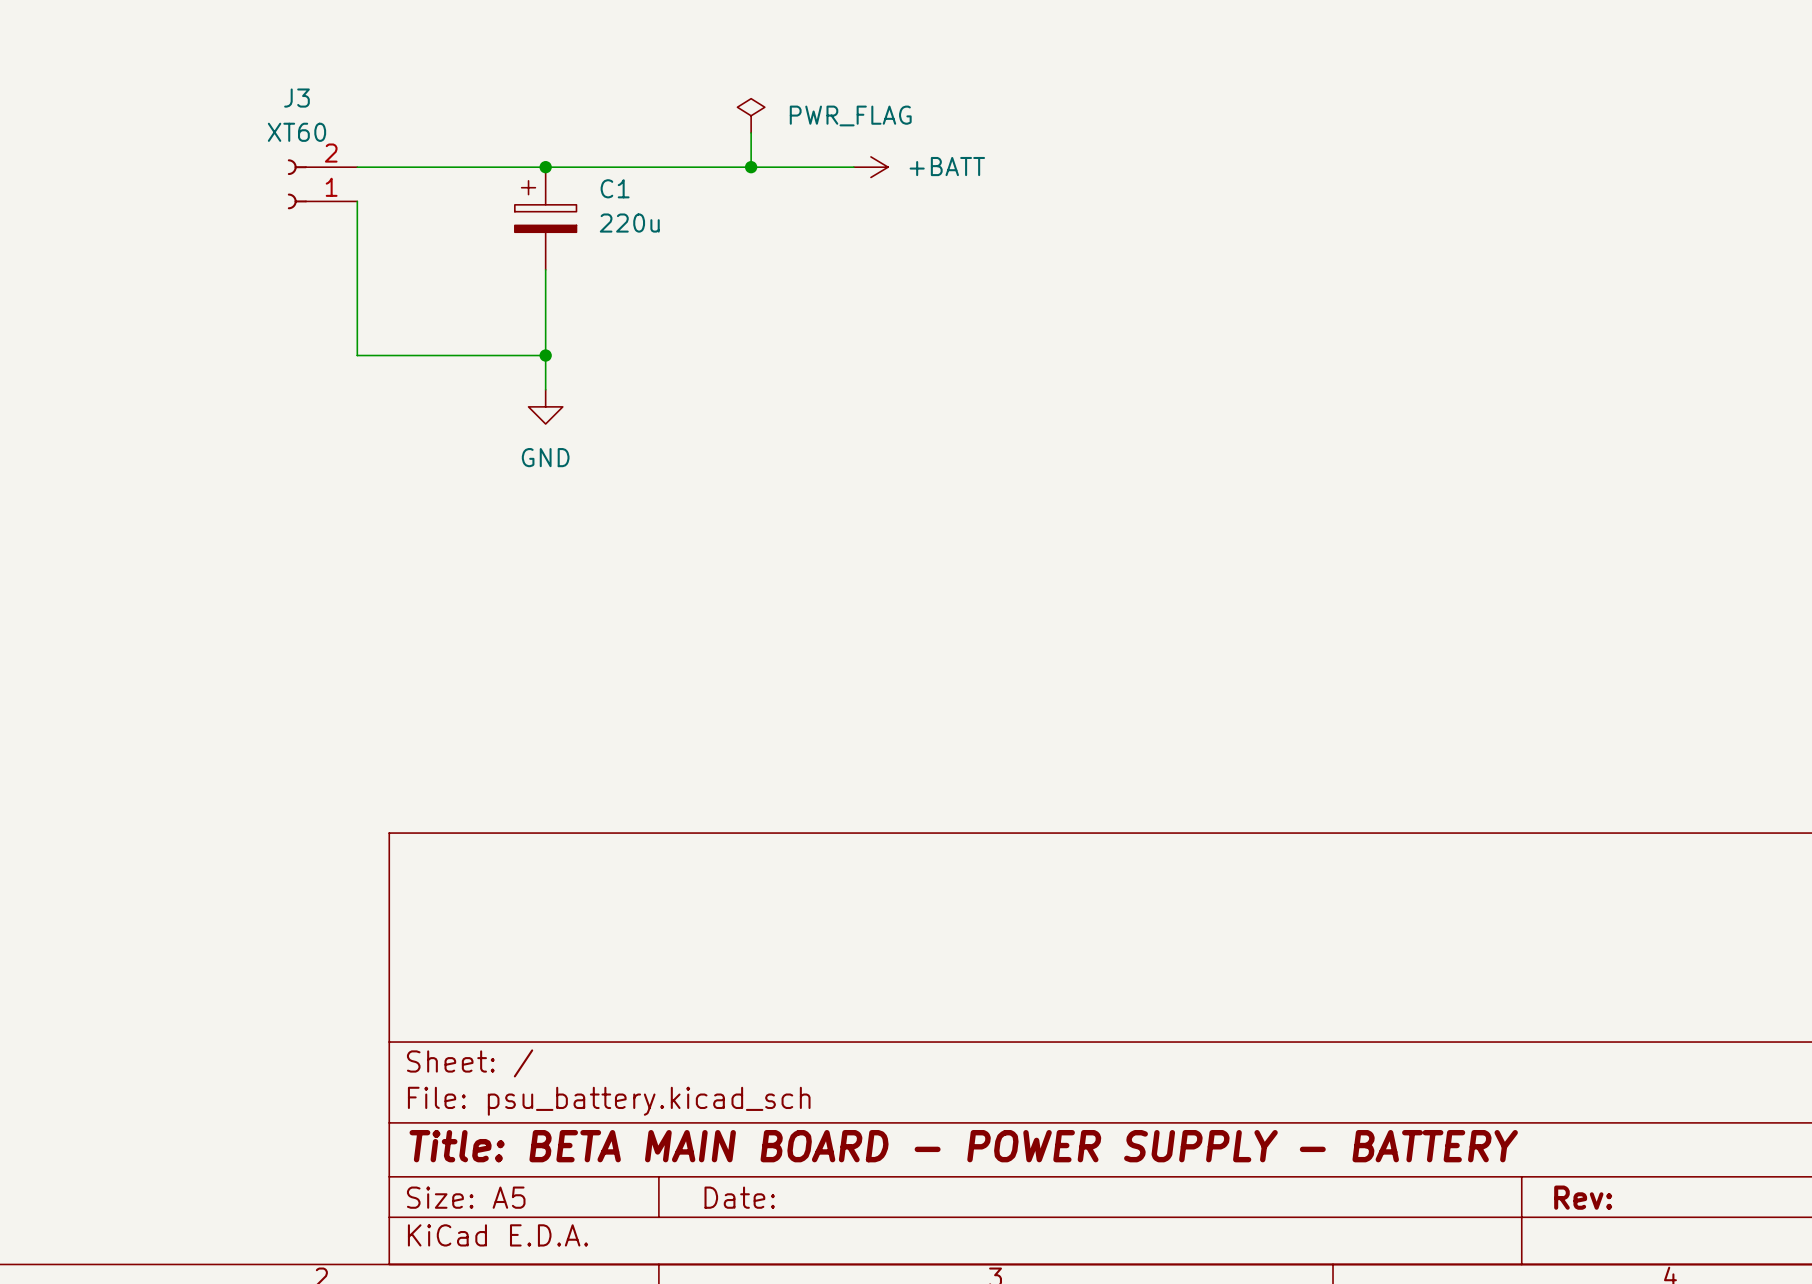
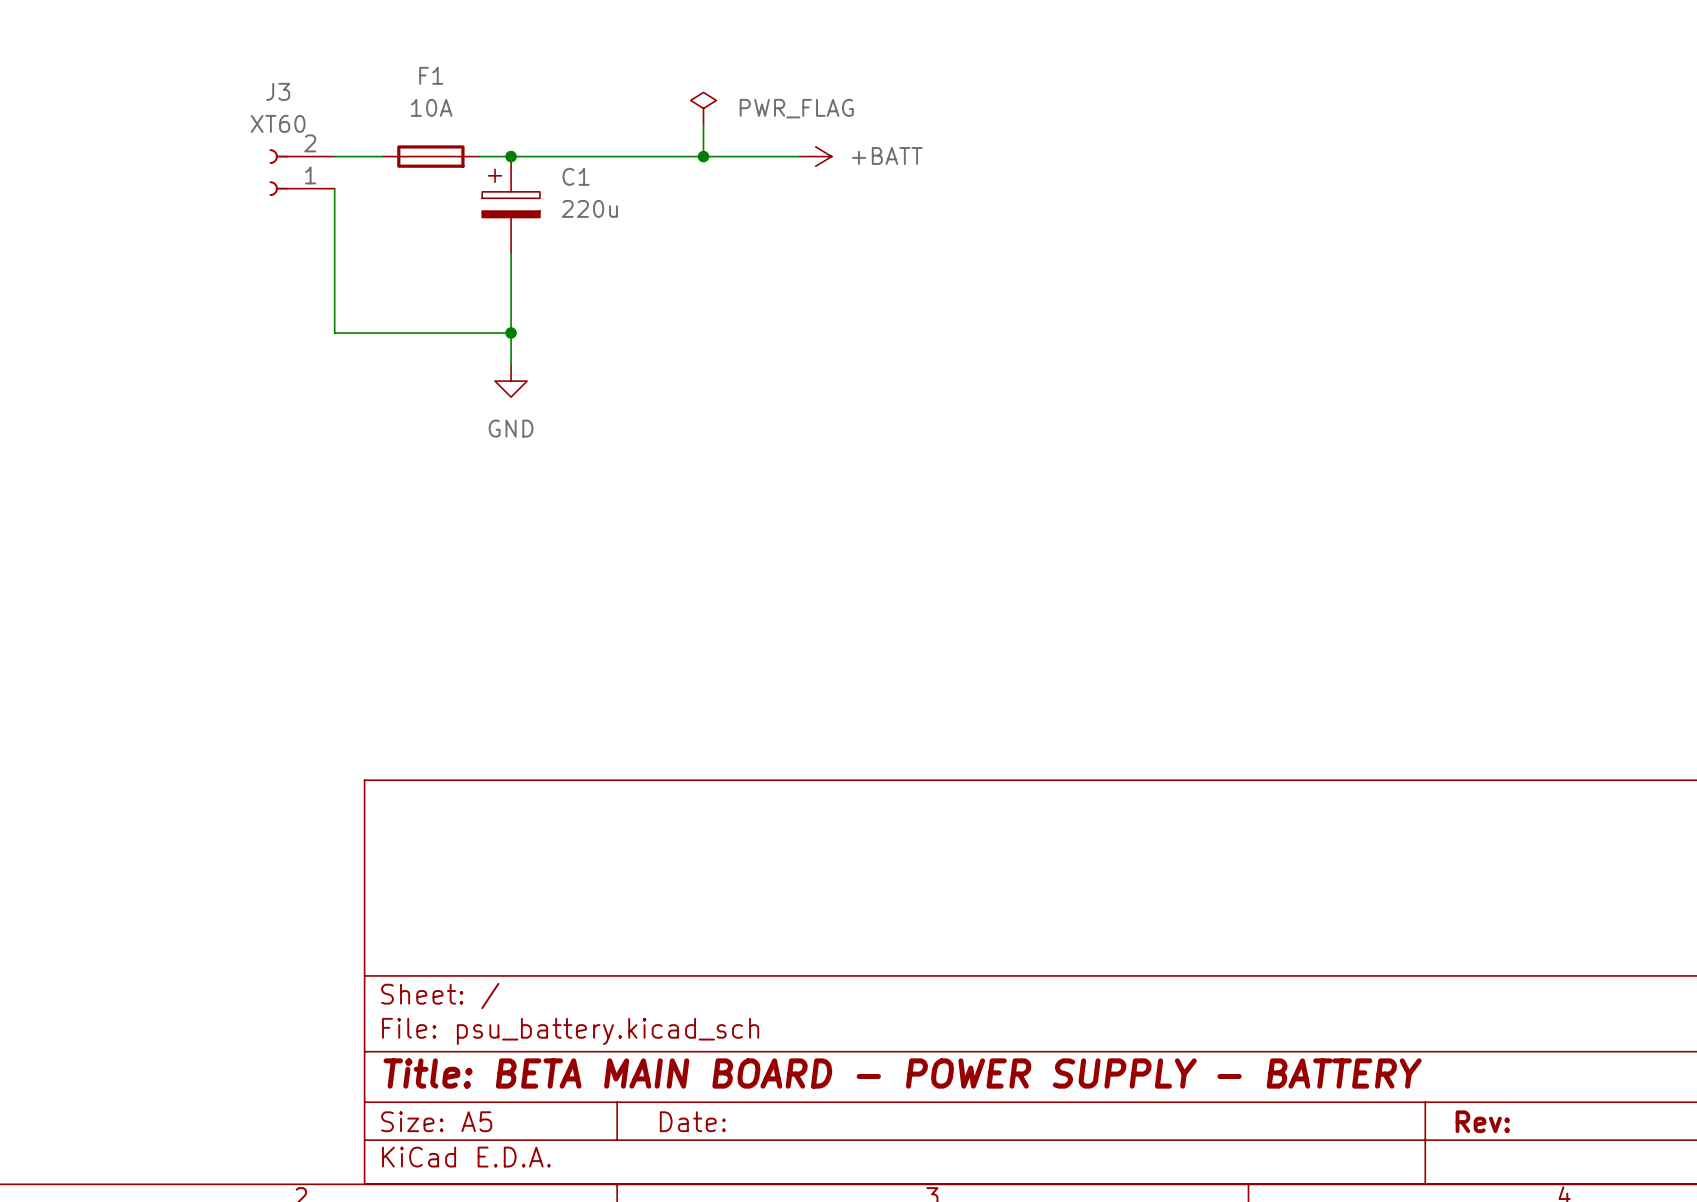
F1: none -> 10A (430, 156)

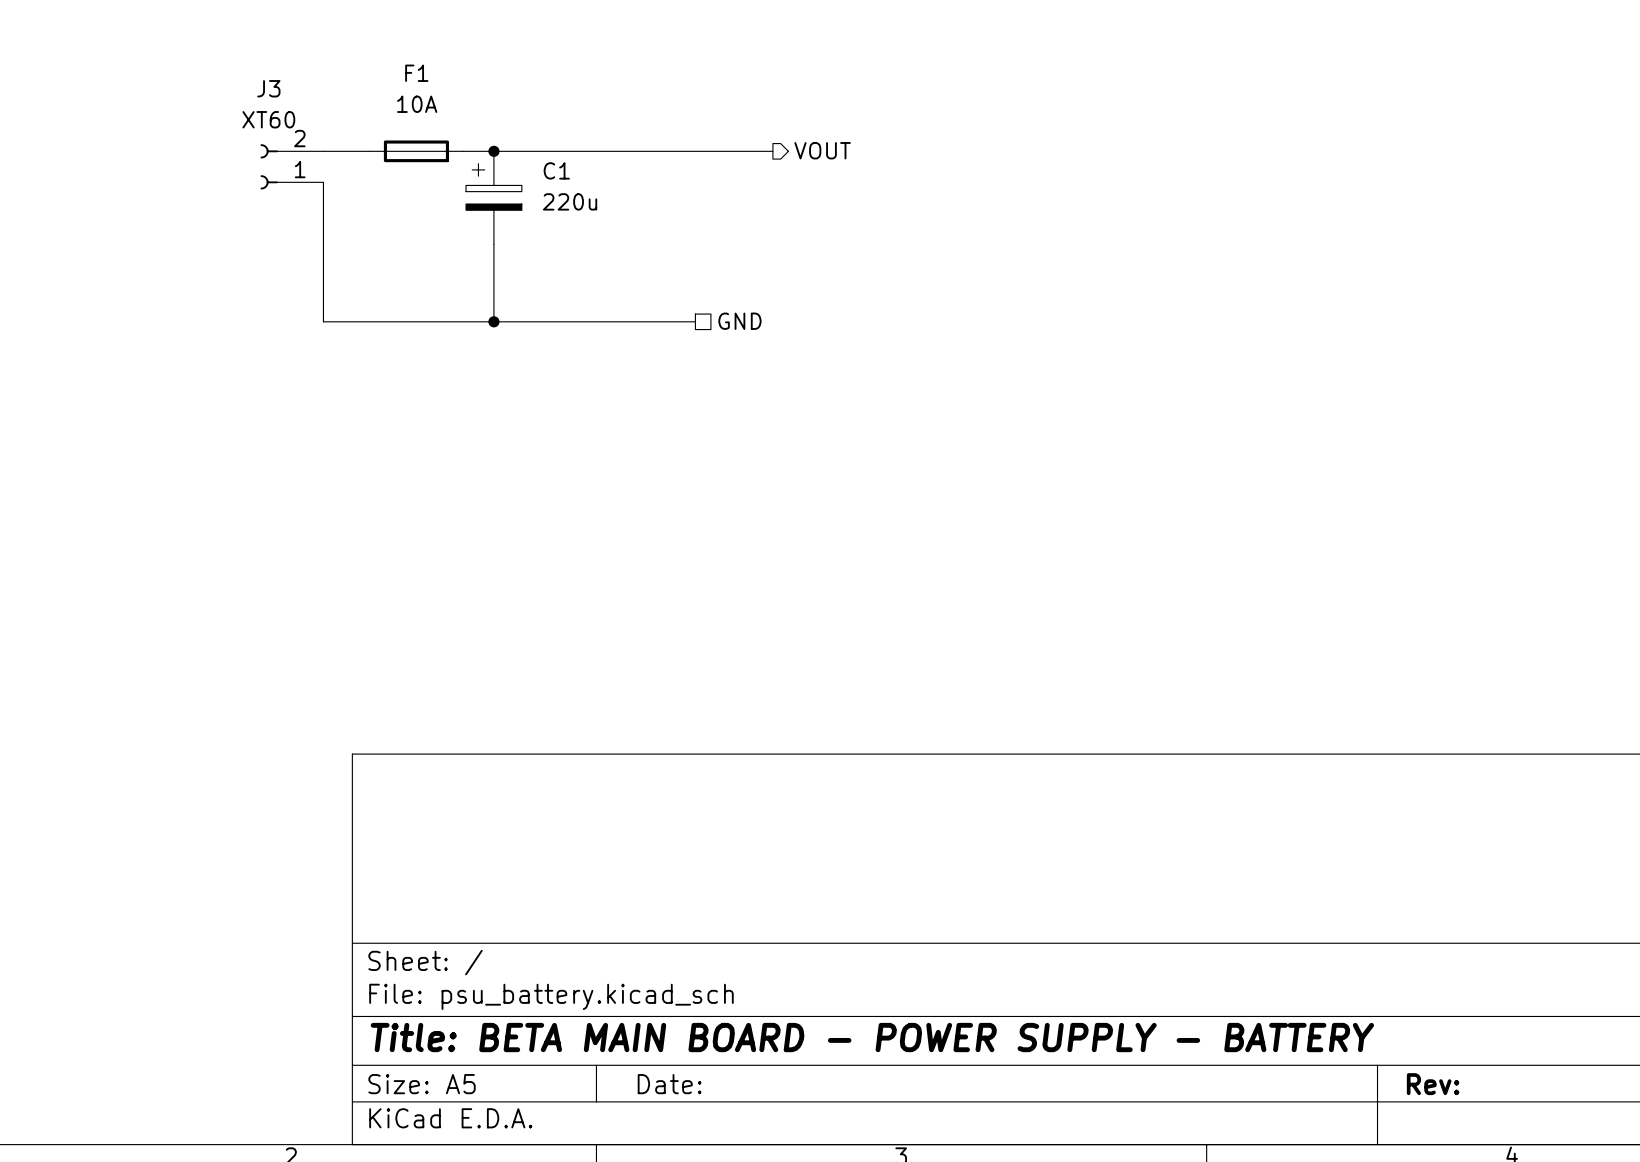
power symbol: PWR_FLAG (703, 108) -> none
wire: (703, 124) (703, 156) -> none
hierarchical label: none -> VOUT (822, 150)
junction: (703, 156) -> none
power symbol: +BATT (815, 156) -> none
wire: (511, 332) (511, 365) -> (493, 321) (695, 321)
hierarchical label: none -> GND (739, 321)
power symbol: GND (511, 381) -> none

